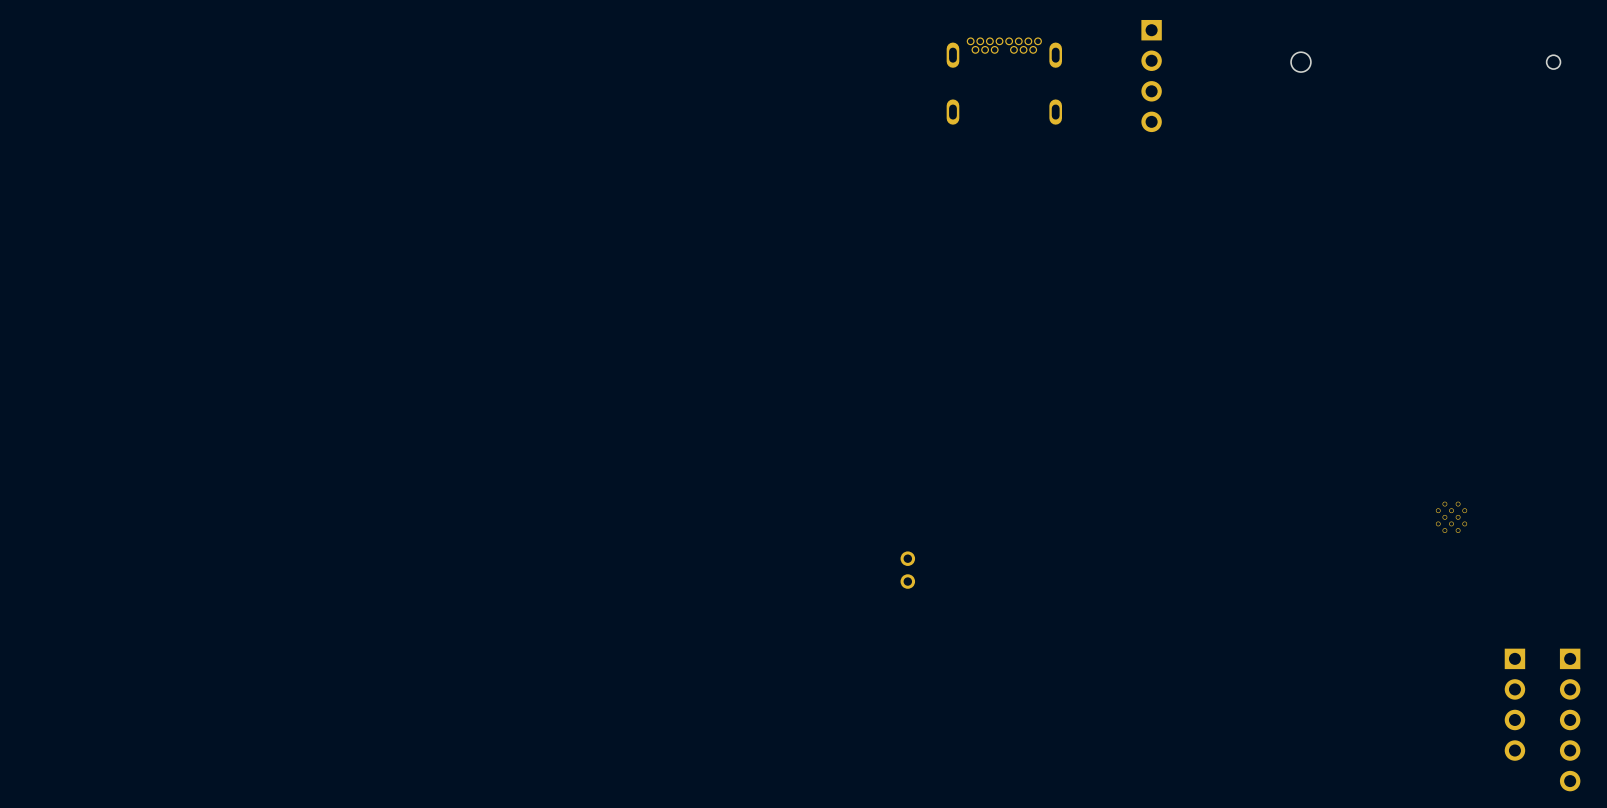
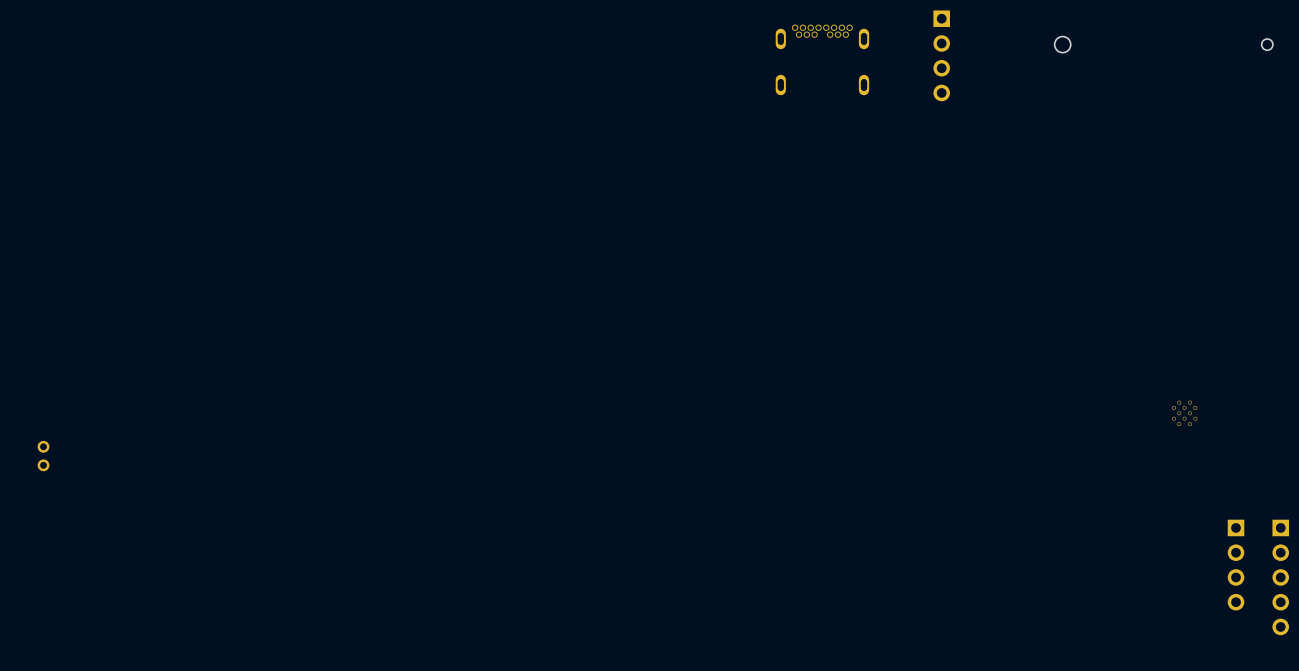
part: none -> (43, 456)
part: (907, 570) -> none

